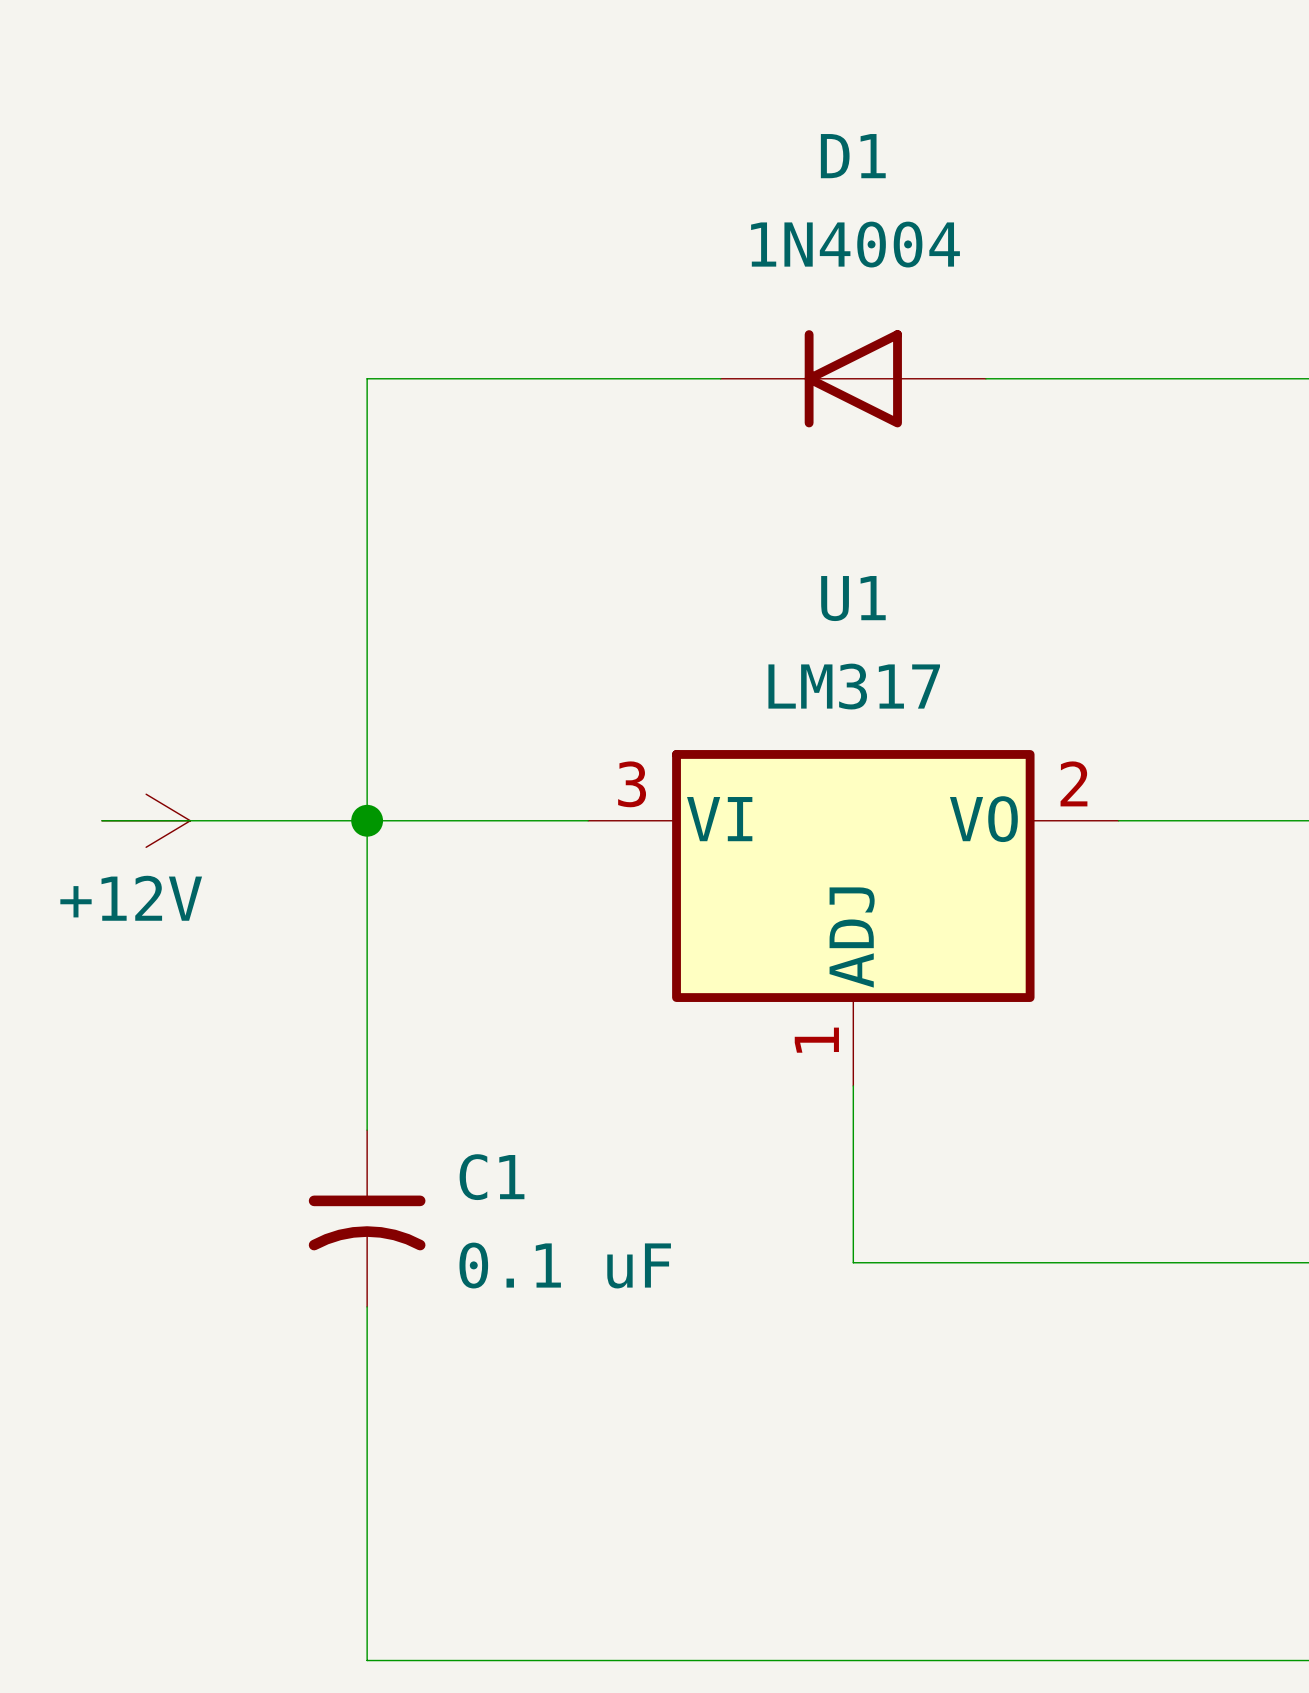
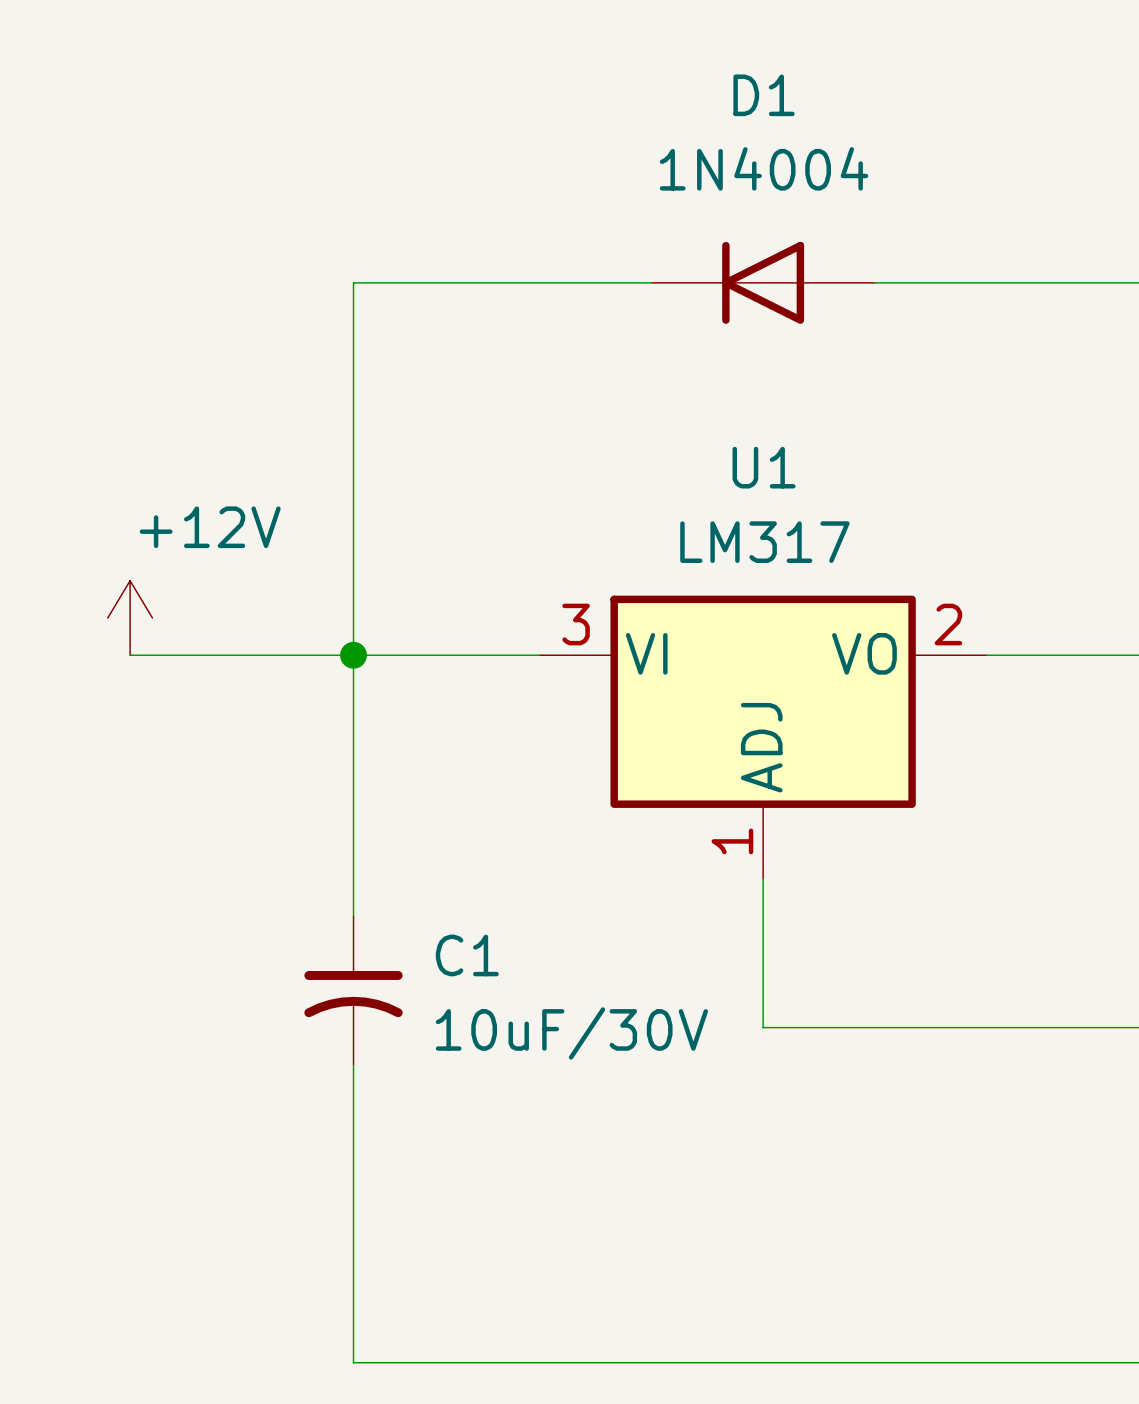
power symbol rotation: 0° (146, 820) -> 90° counterclockwise (130, 618)
power symbol position: +12V (146, 820) -> +12V (130, 618)
power symbol text position: +12V (131, 898) -> +12V (210, 527)
C1 value: 0.1 uF (565, 1265) -> 10uF/30V (571, 1033)

